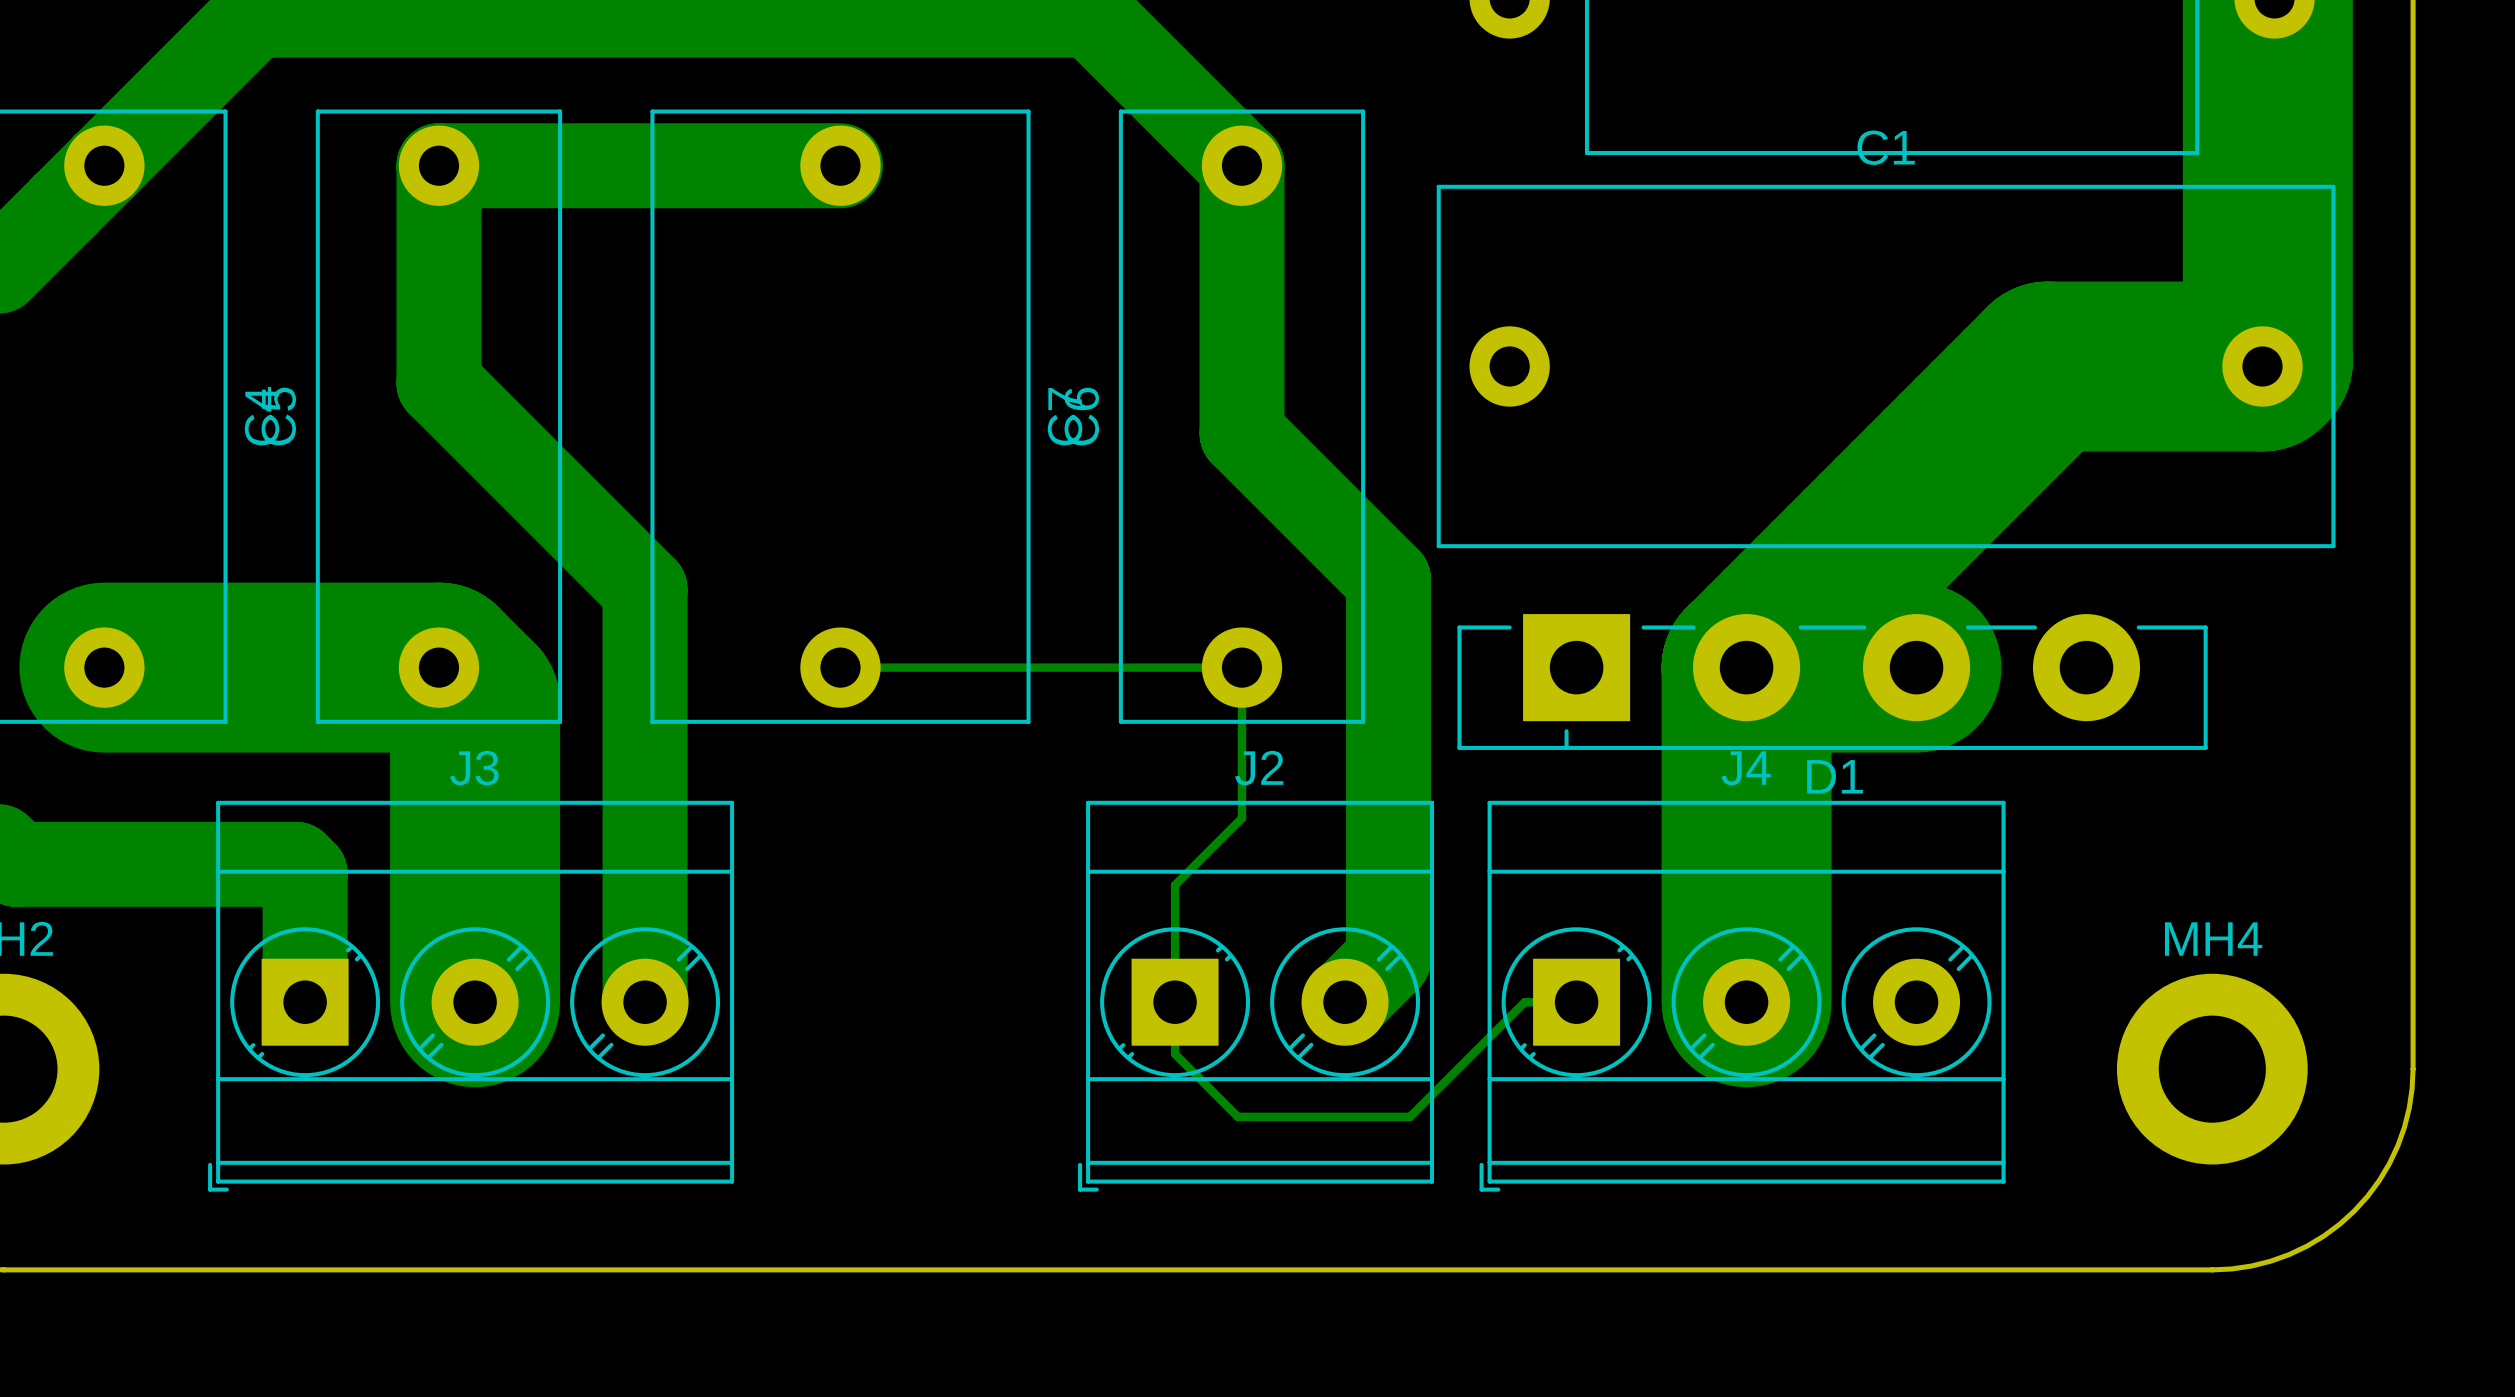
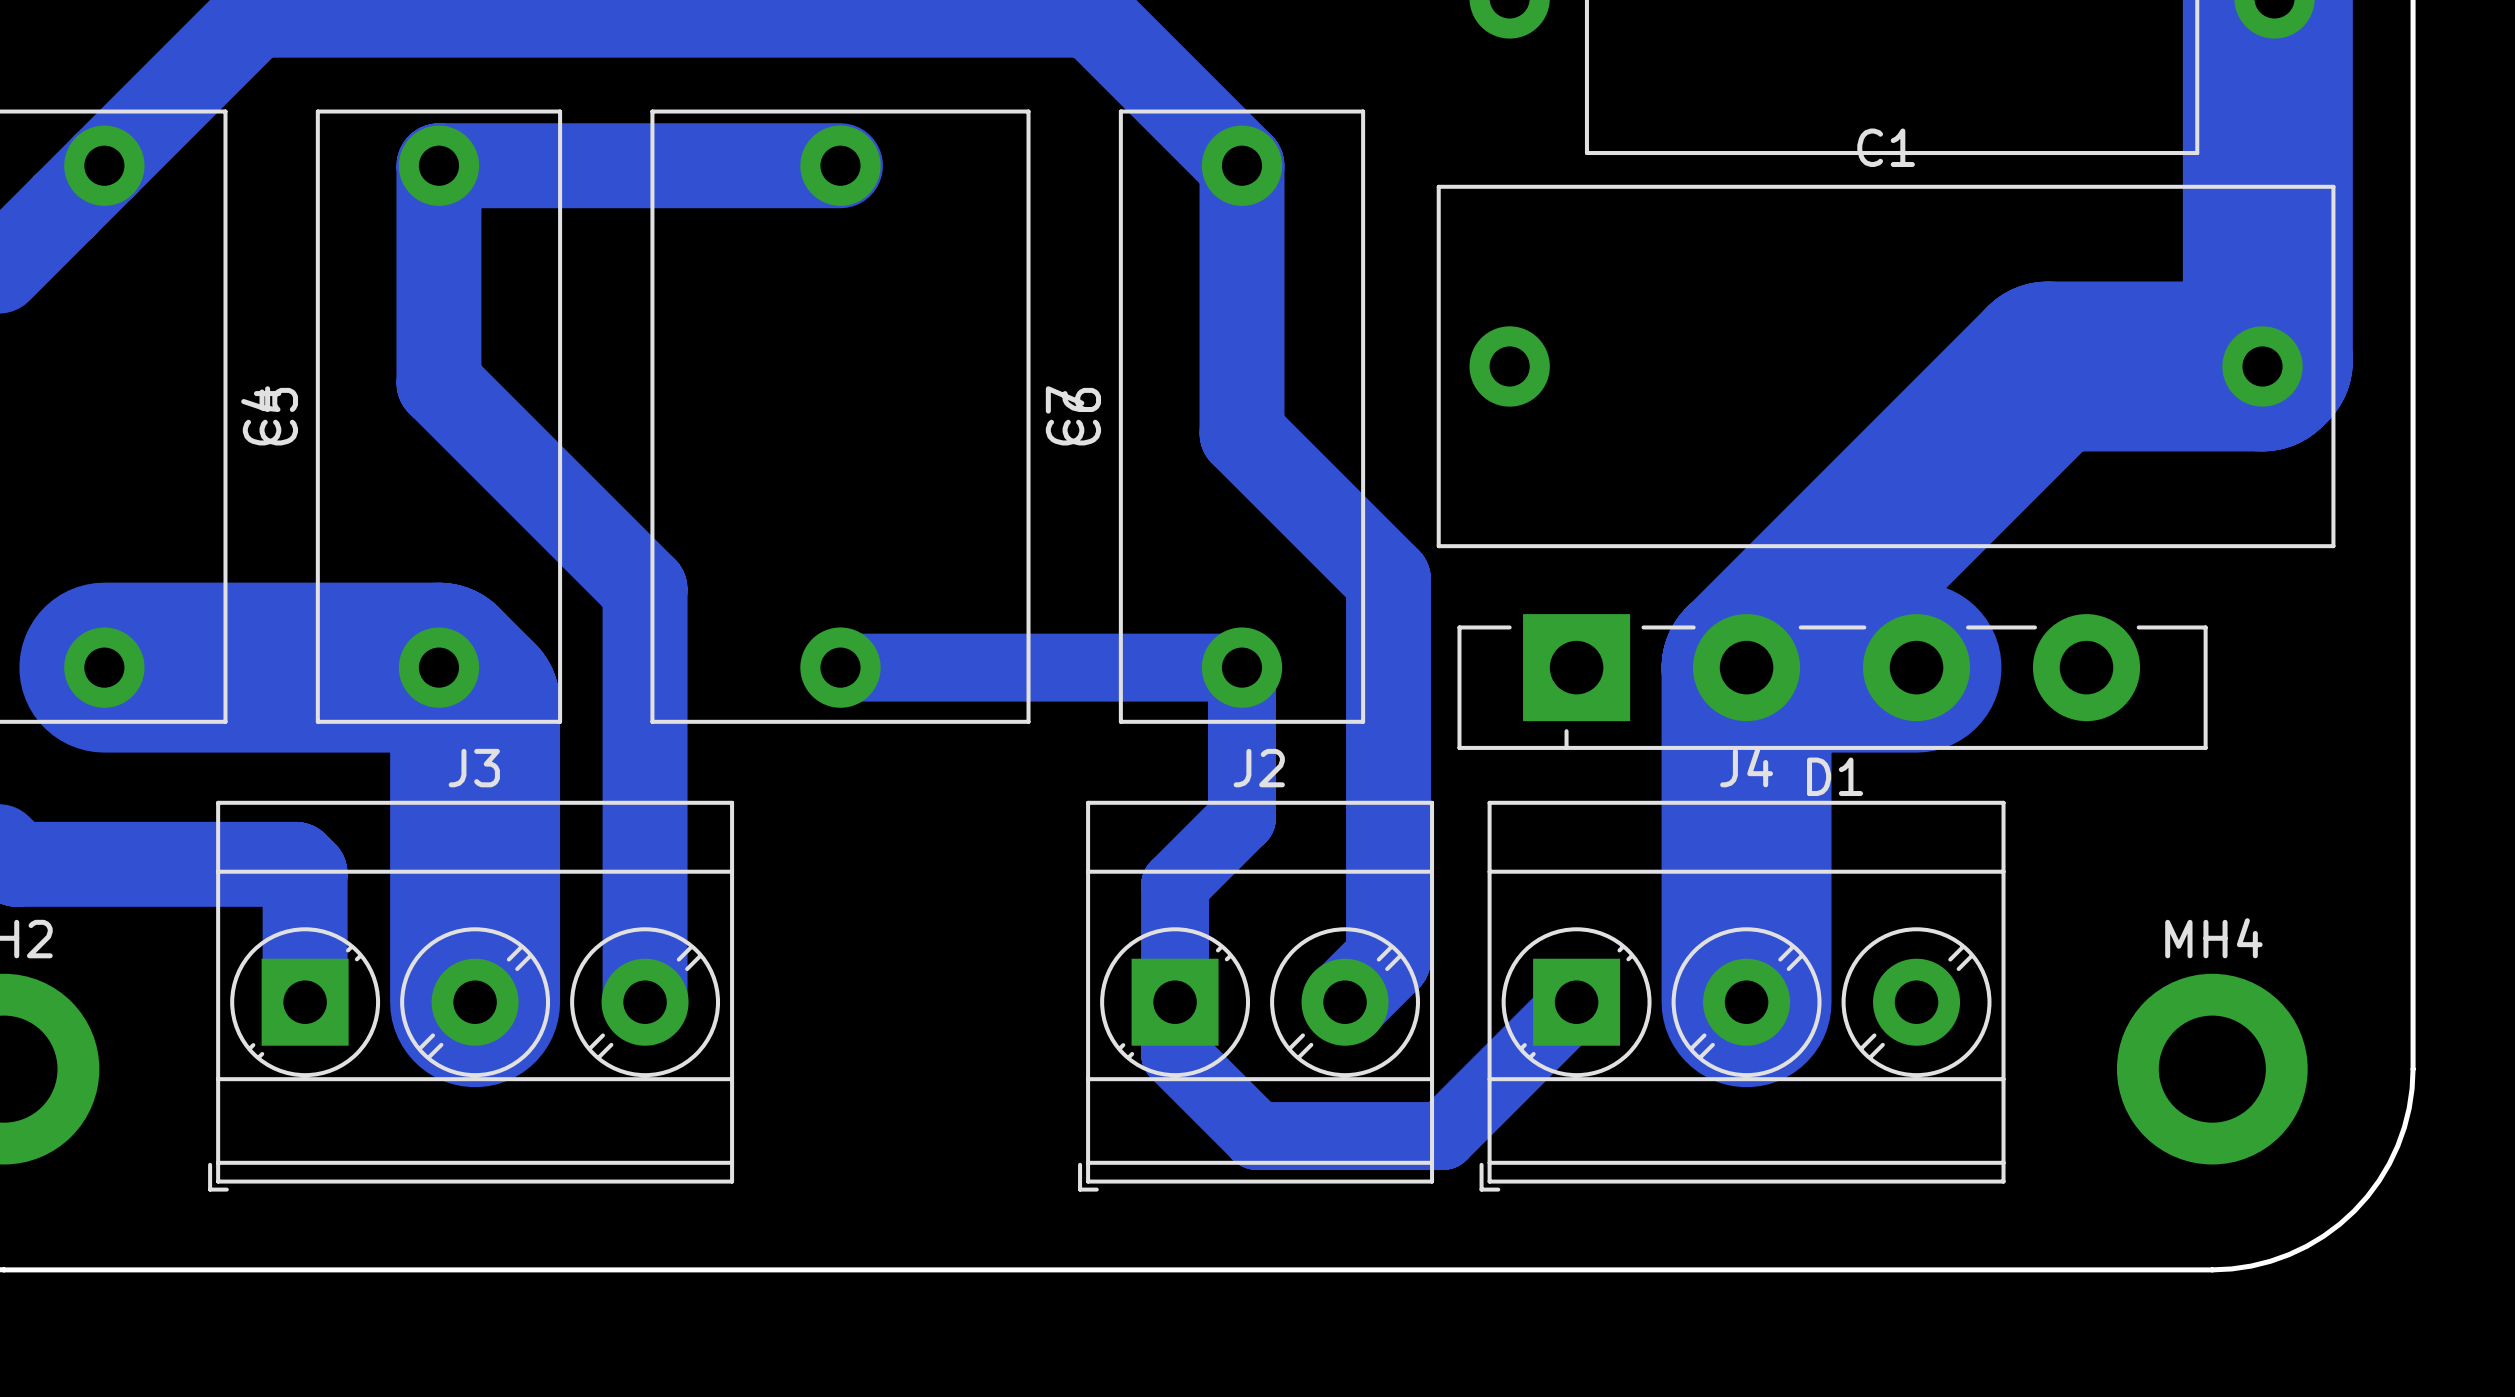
bottom track width: thin (840, 667) (1241, 667) (1241, 818) (1175, 885) (1175, 1054) (1237, 1116) -> thick (840, 667) (1241, 667) (1241, 818) (1175, 885) (1175, 1054) (1237, 1116)
bottom track: (1576, 1002) (1524, 1002) (1410, 1116) (1237, 1116) -> (1576, 1002) (1442, 1136) (1257, 1136) (1237, 1116)

